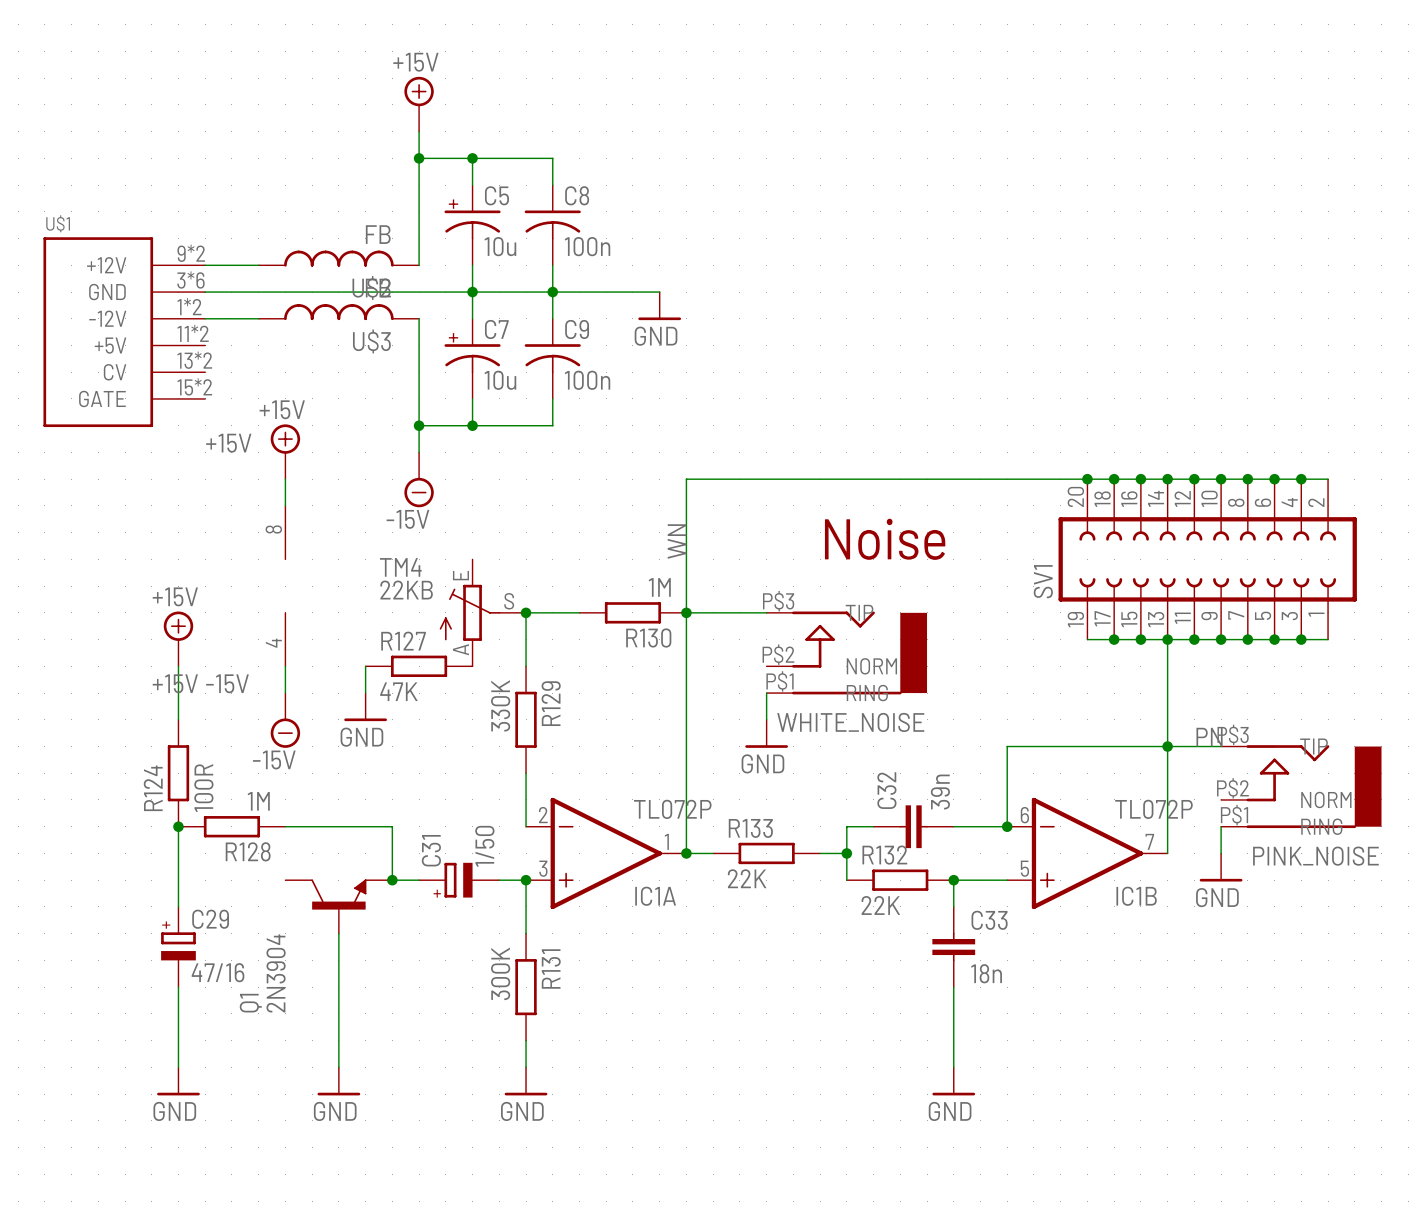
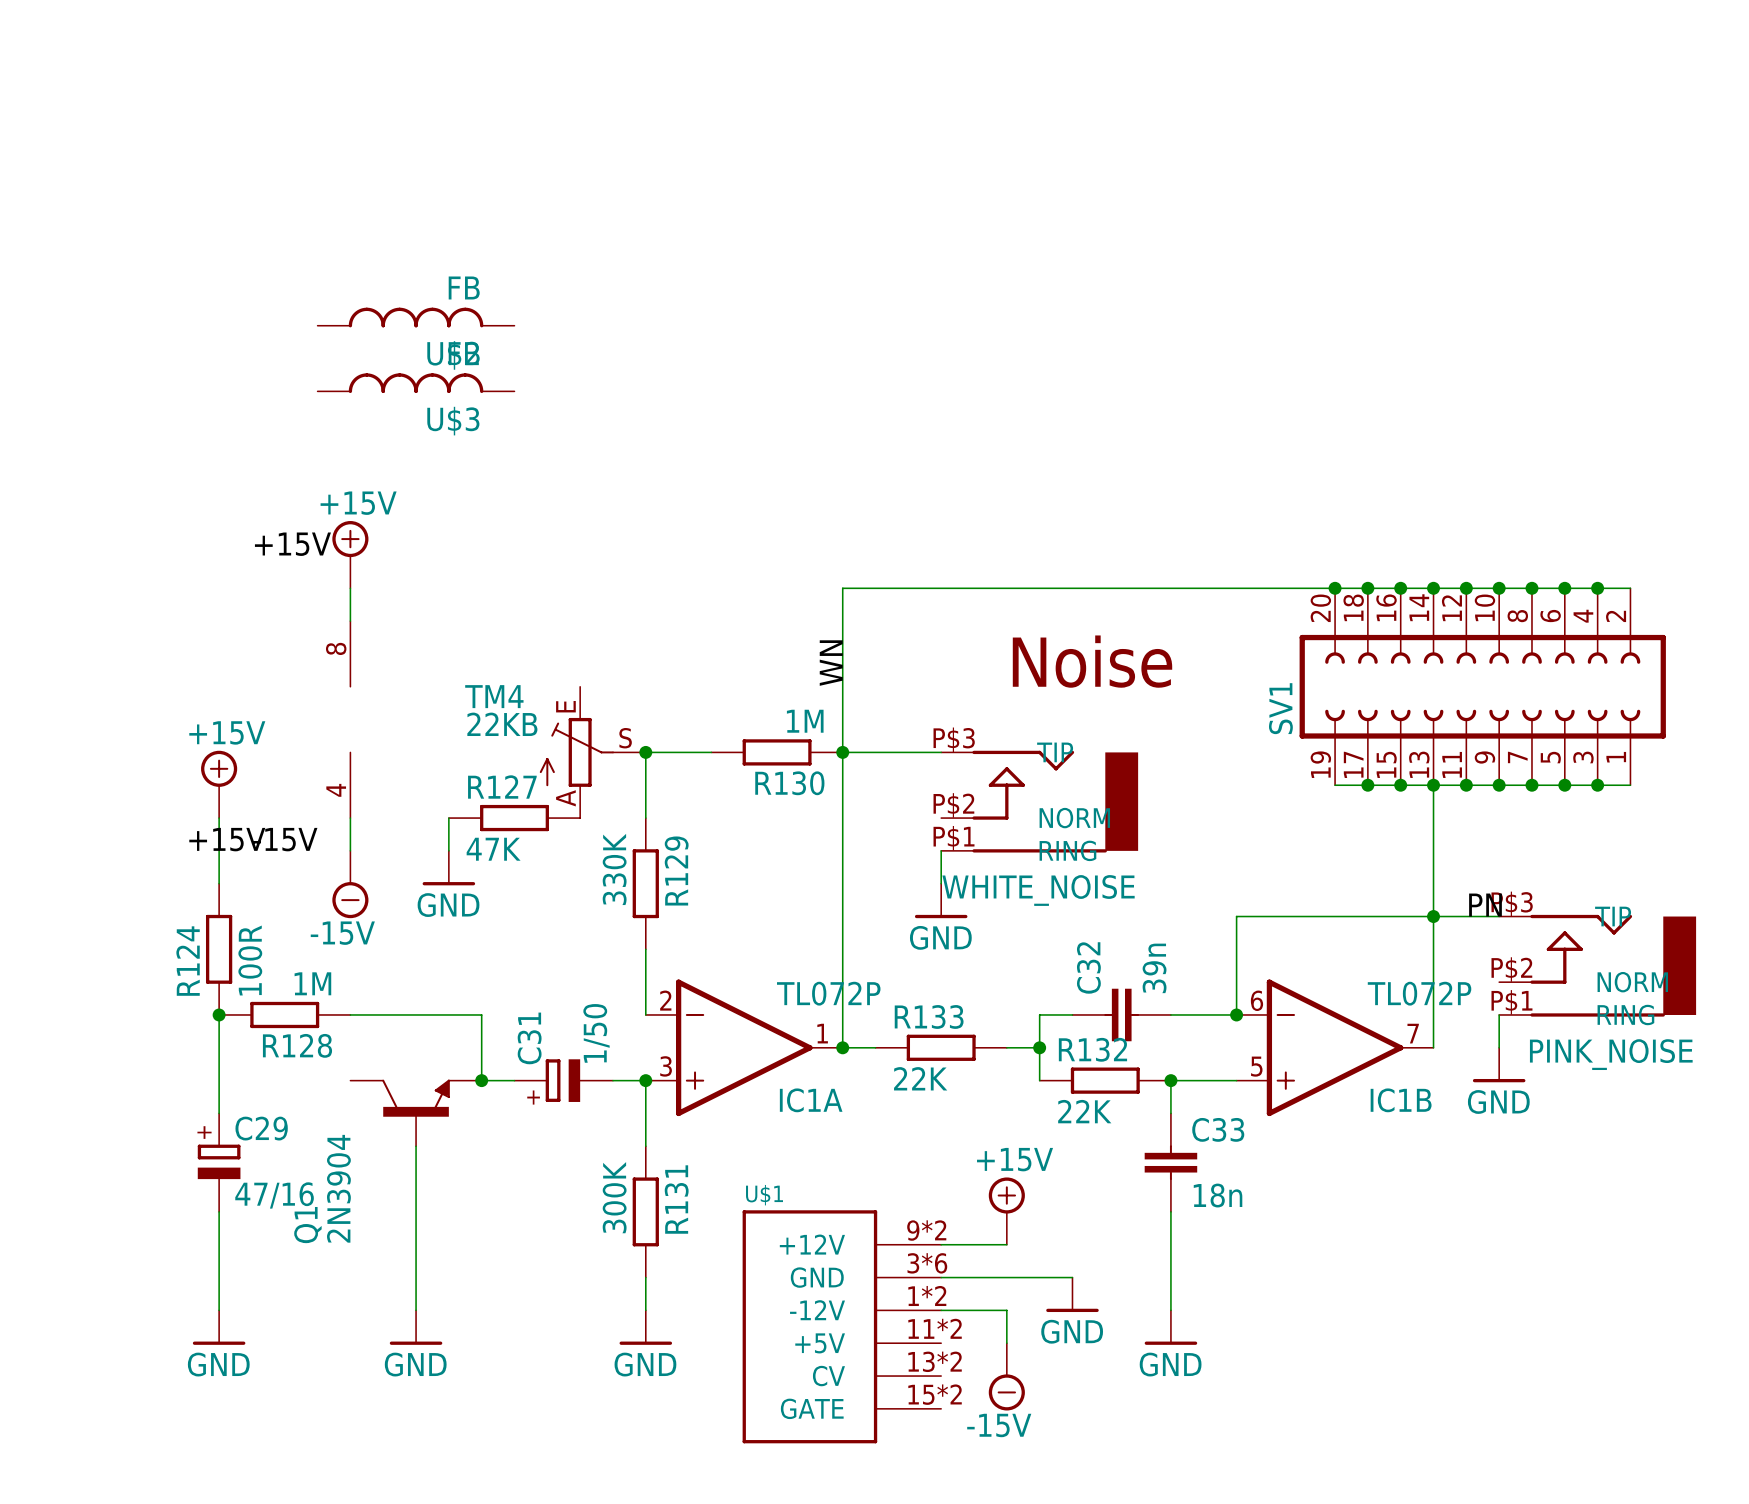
power symbol: +15V (419, 104) -> none
wire: (419, 131) (419, 265) -> none
wire: (419, 158) (552, 158) (552, 185) -> none
junction: (419, 158) -> none
wire: (472, 158) (472, 185) -> none
junction: (472, 158) -> none
C5: 10u (472, 225) -> none
C8: 100n (552, 225) -> none
wire: (205, 265) (258, 265) -> none
wire: (472, 265) (472, 318) -> none
wire: (552, 265) (552, 318) -> none
wire: (205, 292) (659, 292) -> none
junction: (472, 292) -> none
junction: (552, 292) -> none
power symbol: GND (659, 306) -> none
wire: (205, 318) (258, 318) -> none
wire: (419, 318) (419, 452) -> none
U$1 position: (124, 332) -> (841, 1326)
C7: 10u (472, 358) -> none
C9: 100n (552, 358) -> none
wire: (472, 398) (472, 425) -> none
wire: (552, 398) (552, 425) (419, 425) -> none
junction: (419, 425) -> none
junction: (472, 425) -> none
power symbol: -15V (419, 479) -> none
power symbol: none -> +15V (1006, 1211)
wire: none -> (941, 1244) (1006, 1244)
wire: none -> (941, 1277) (1072, 1277)
power symbol: none -> GND (1072, 1294)
wire: none -> (941, 1310) (1006, 1310) (1006, 1343)
power symbol: none -> -15V (1006, 1376)

